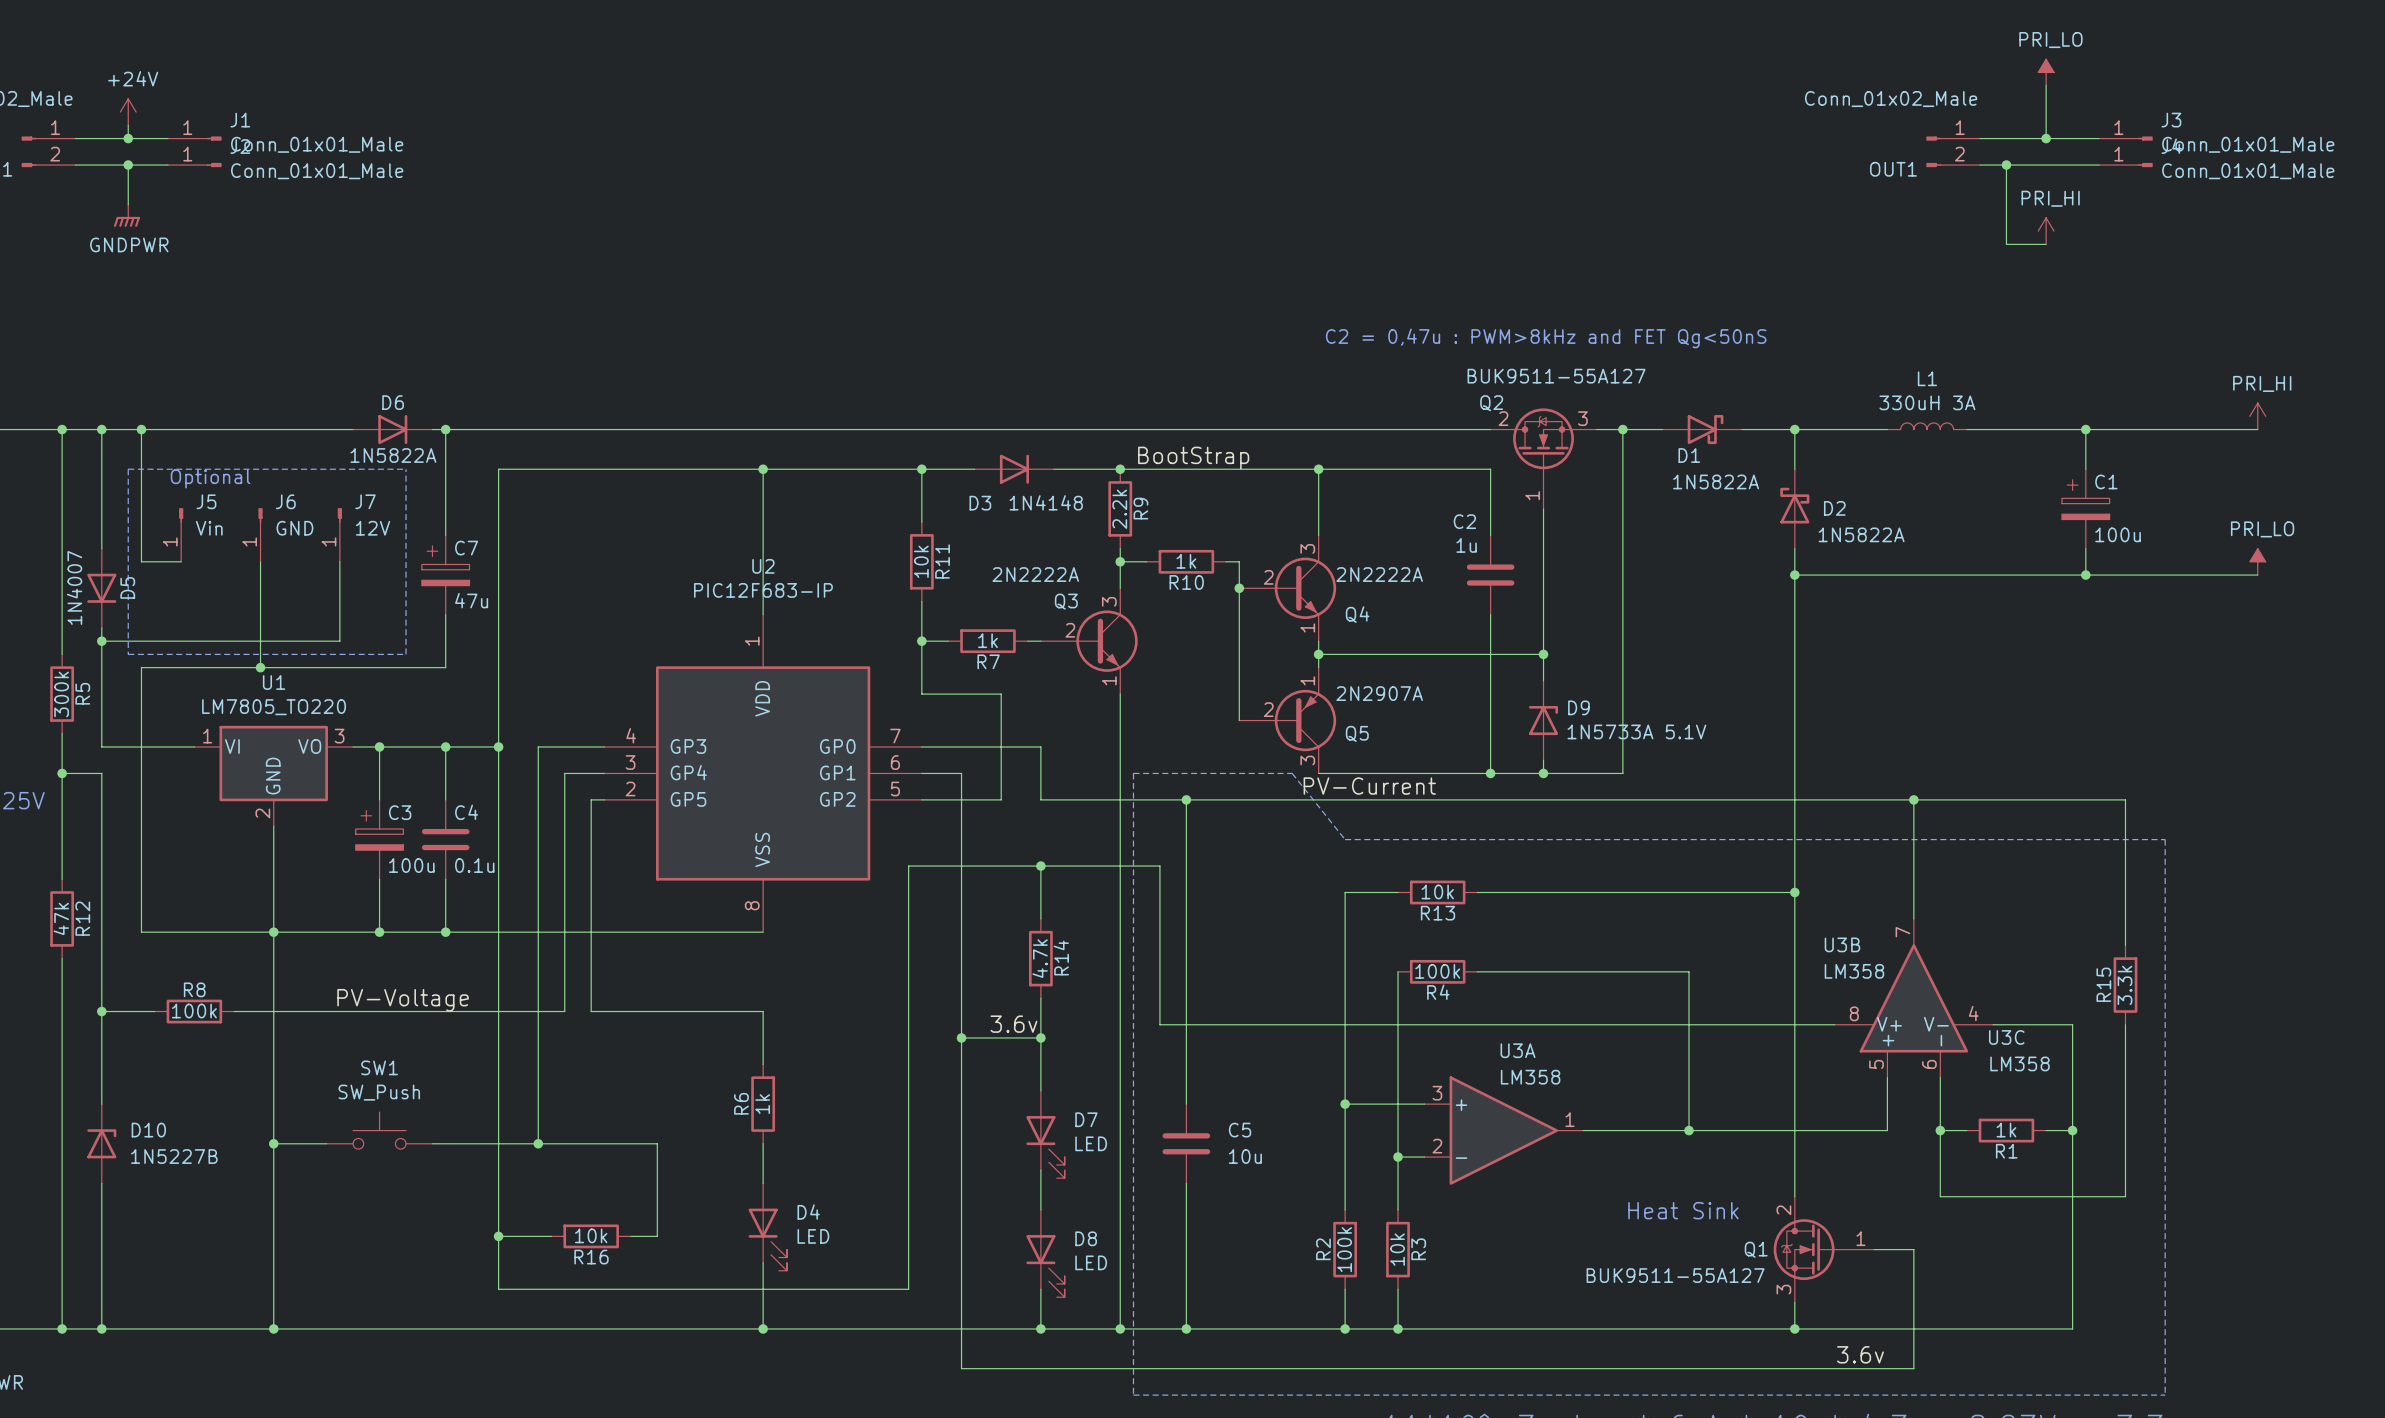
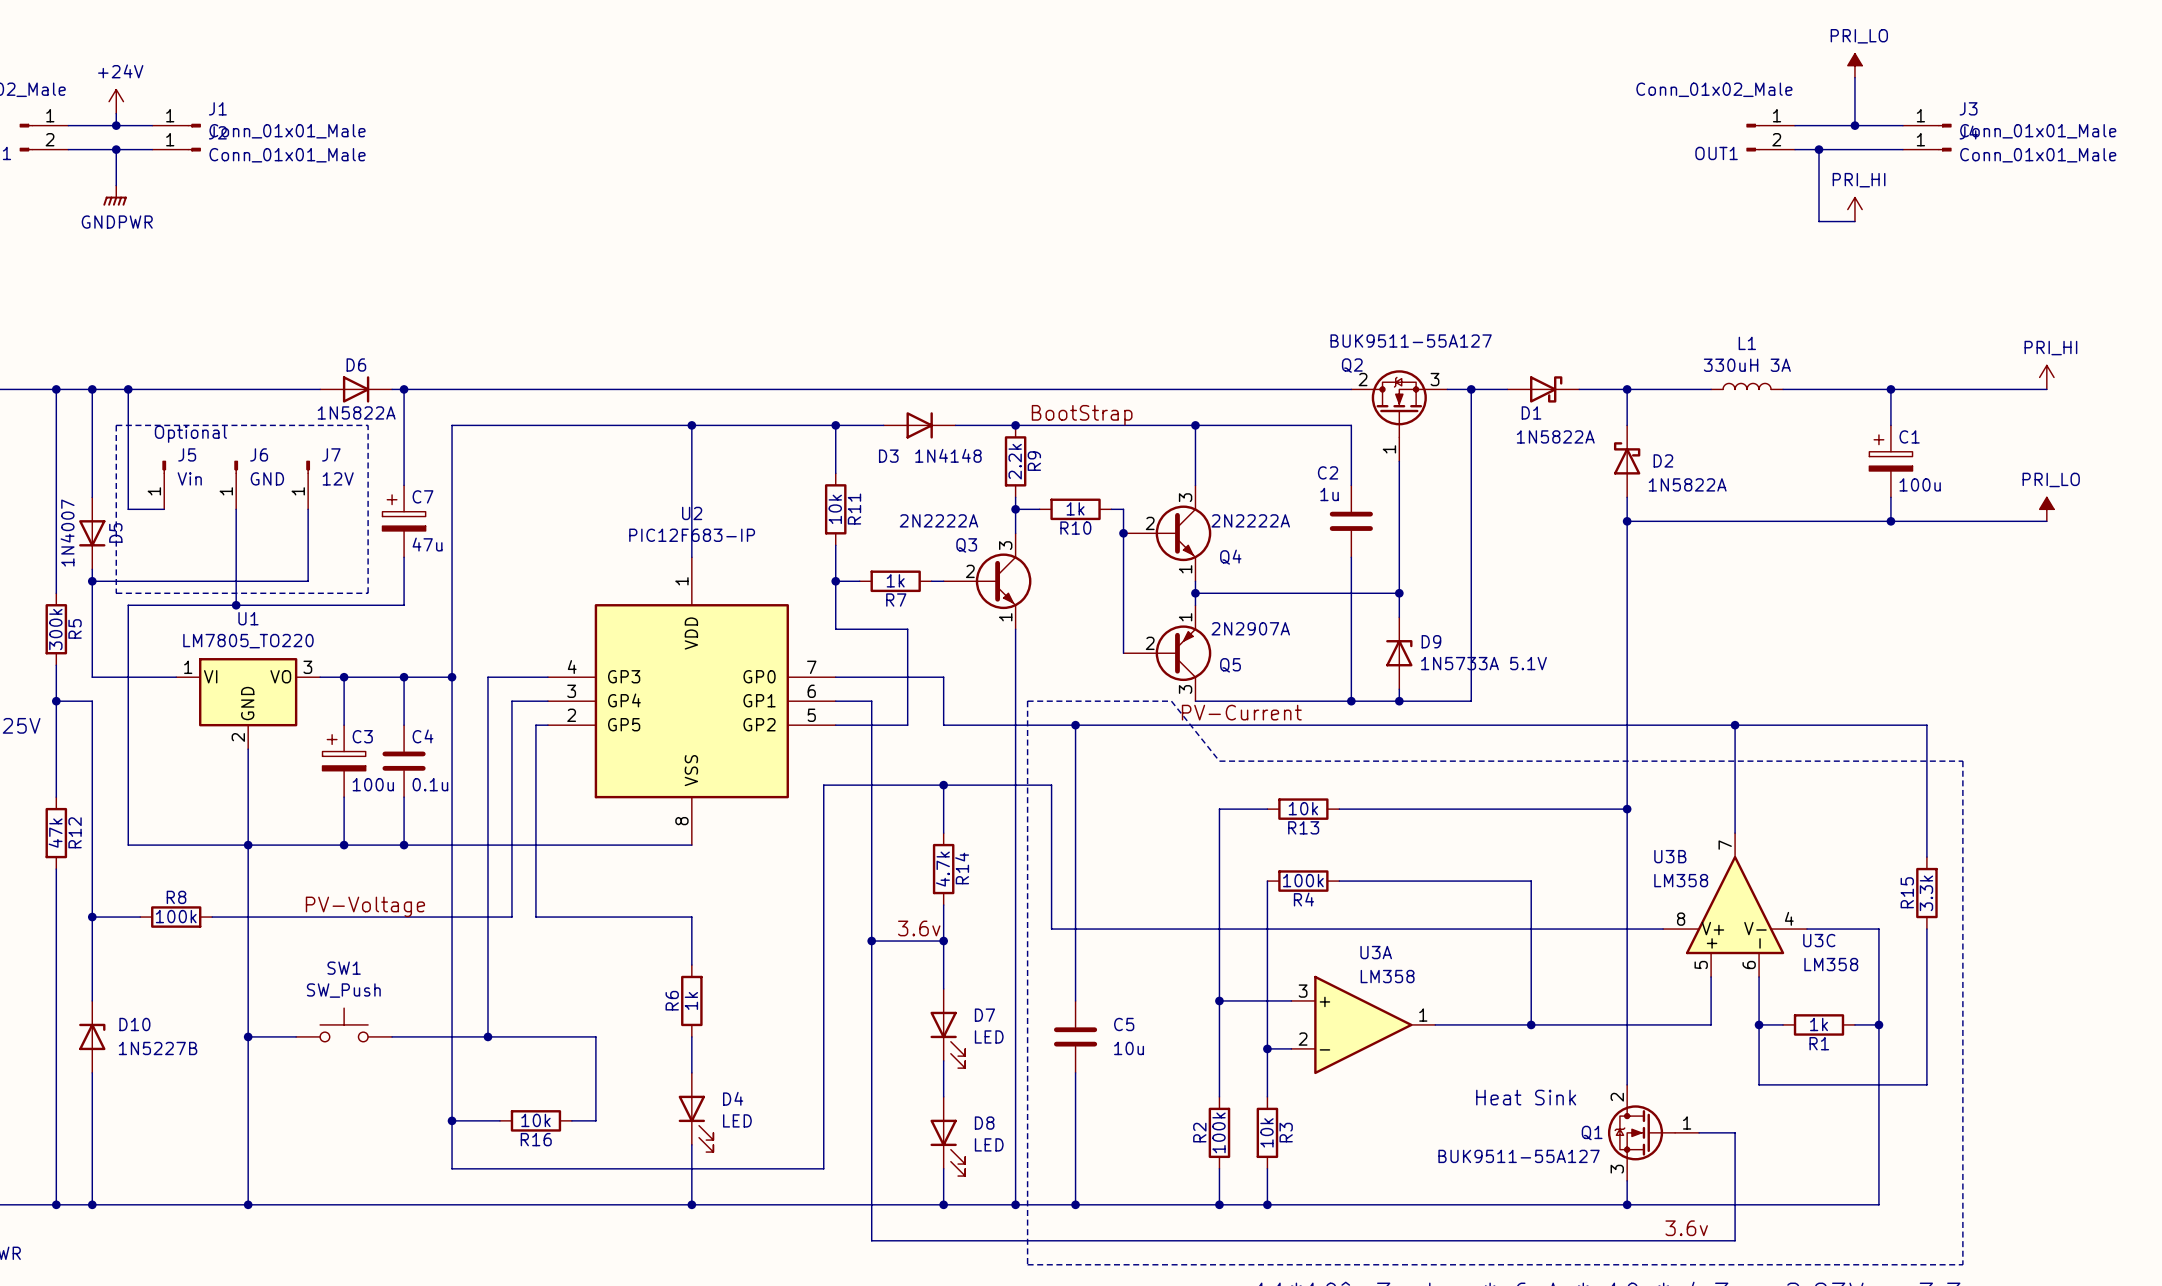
text: C2 = 0,47u : PWM>8kHz and FET Qg<50nS (1546, 338) -> none

